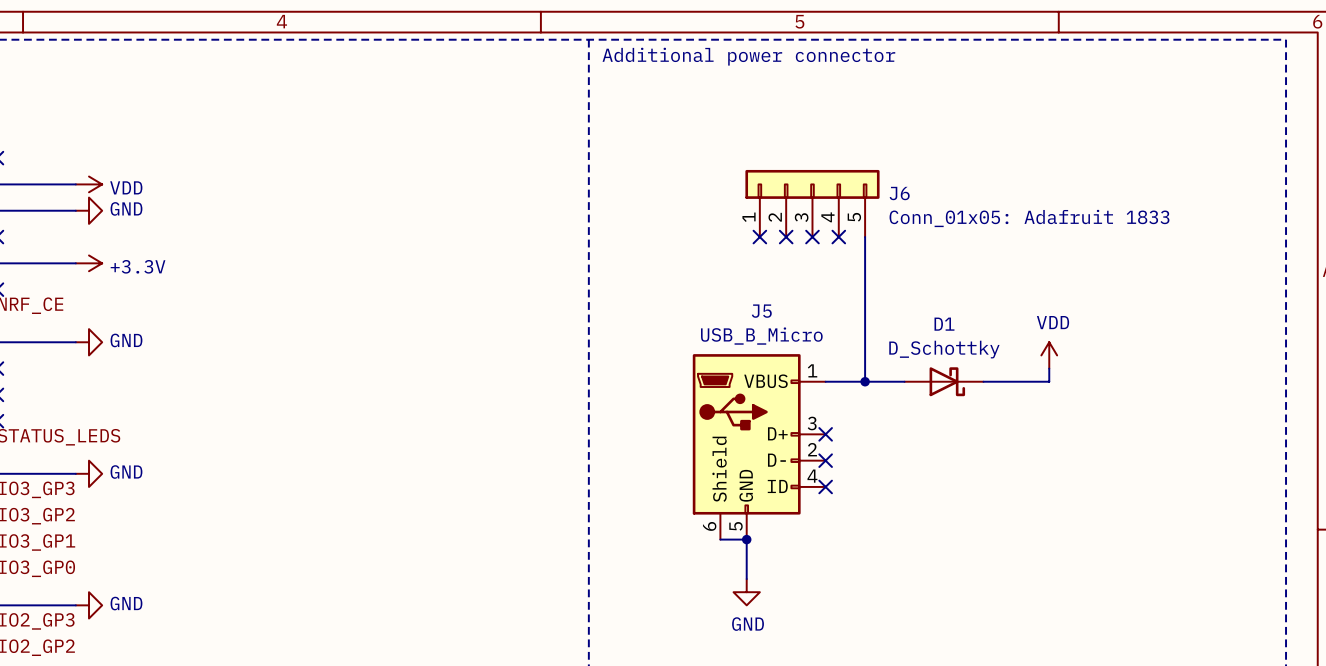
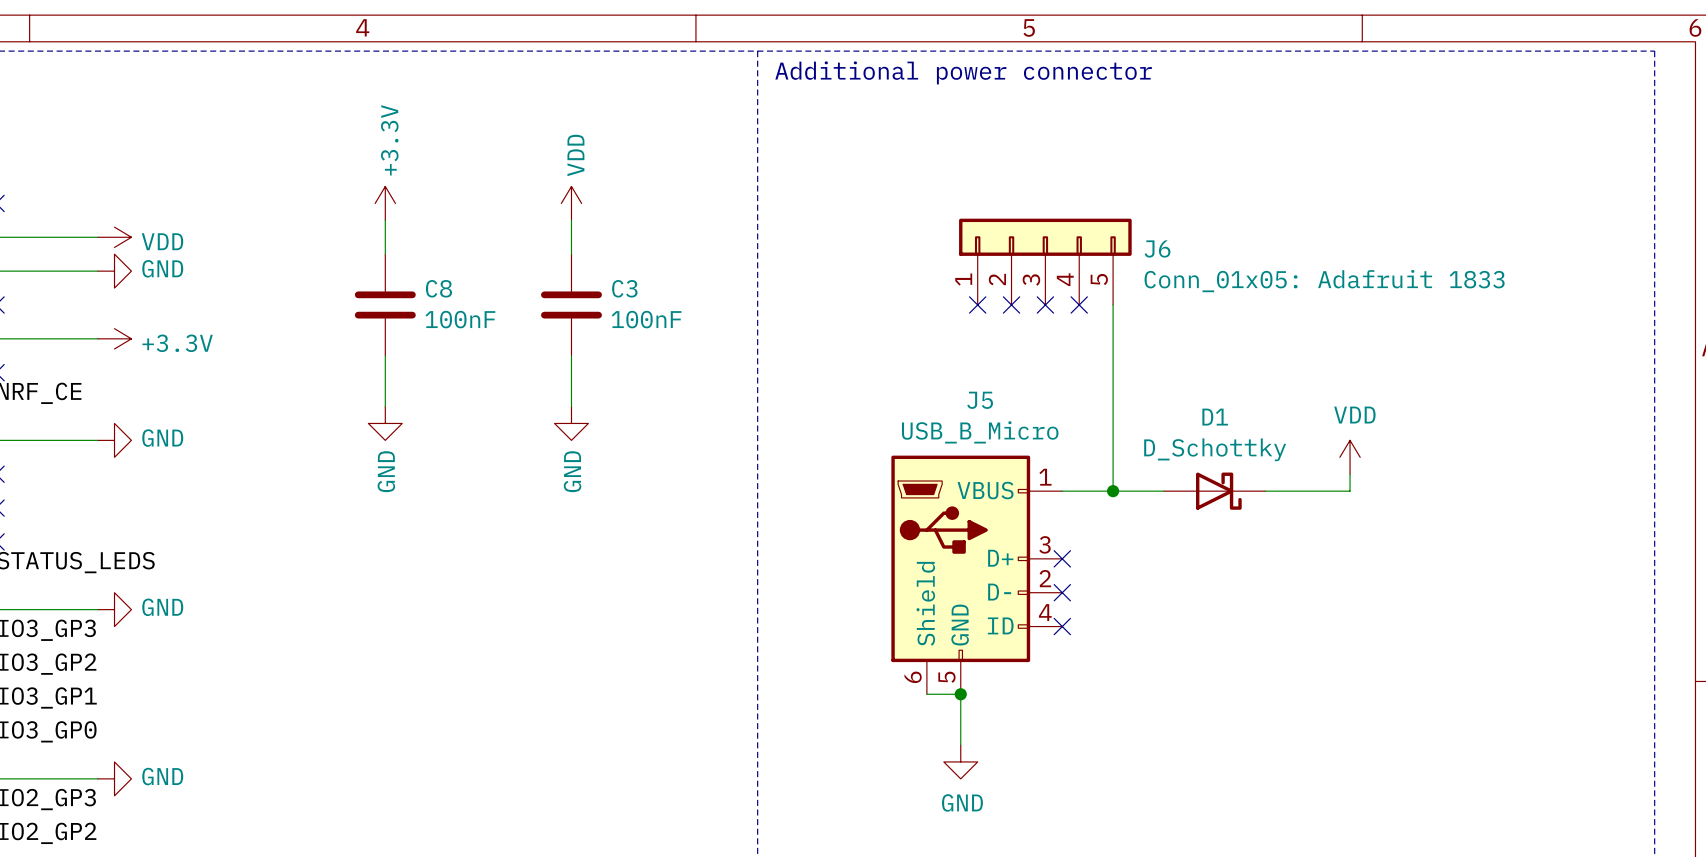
power symbol: none -> +3.3V (385, 203)
power symbol: none -> VDD (571, 203)
wire: none -> (385, 220) (385, 254)
wire: none -> (571, 220) (571, 254)
C8: none -> 100nF (385, 304)
C3: none -> 100nF (571, 304)
wire: none -> (385, 355) (385, 406)
wire: none -> (571, 355) (571, 406)
power symbol: none -> GND (385, 423)
power symbol: none -> GND (571, 423)

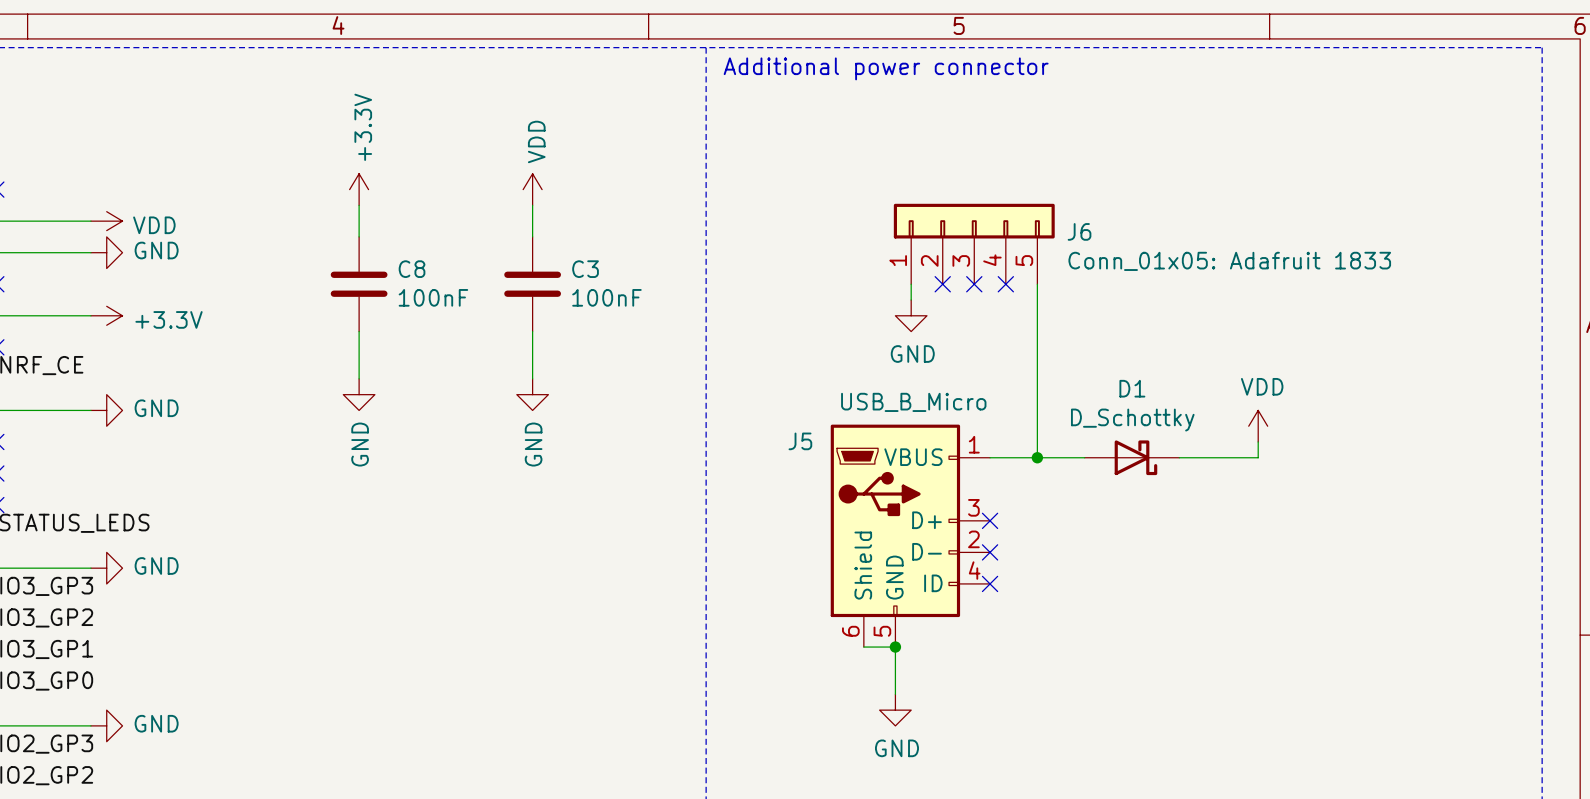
wire: none -> (911, 284) (911, 300)
no-connect mark: (977, 304) -> none
power symbol: none -> GND (911, 315)
J5 name position: J5 (980, 400) -> J5 (800, 441)

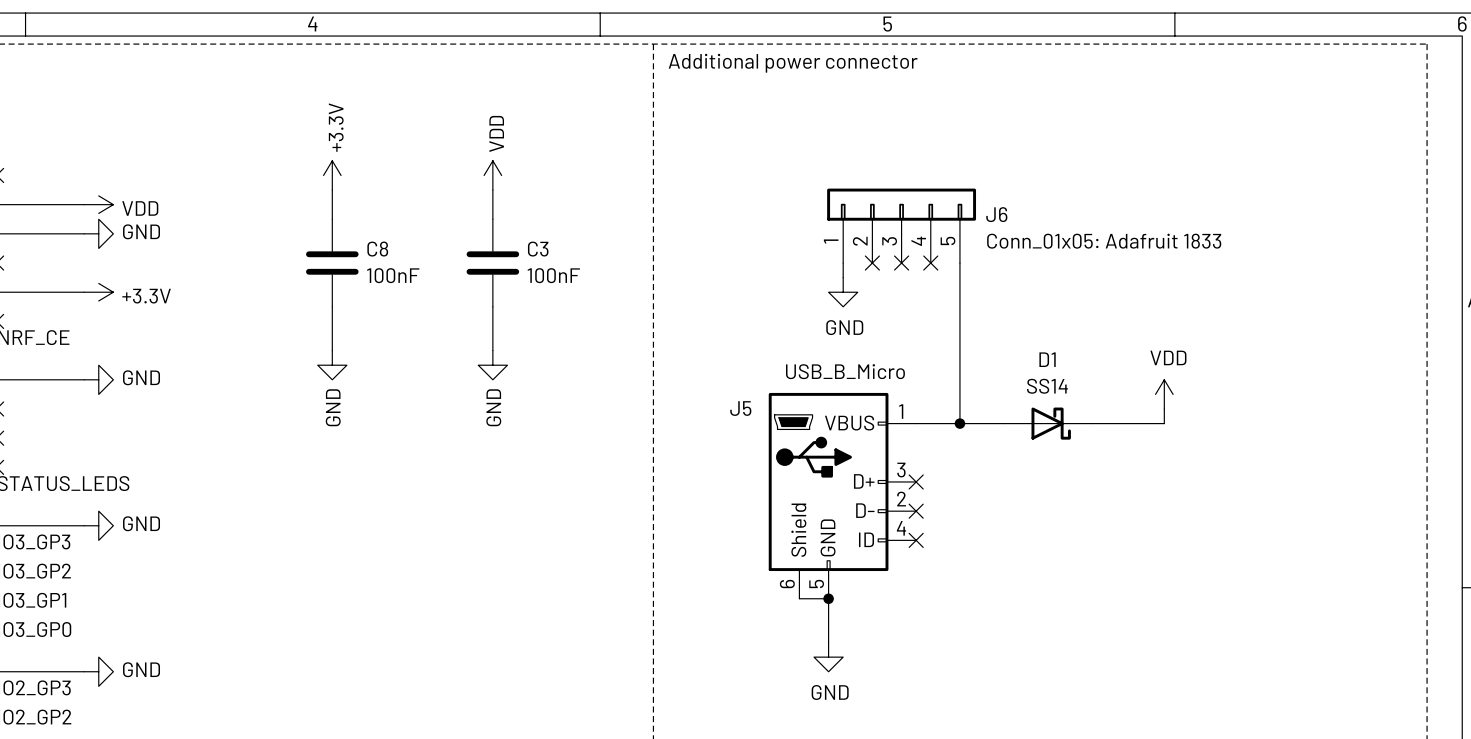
D1 value: D_Schottky (1132, 420) -> SS14 (1047, 386)

